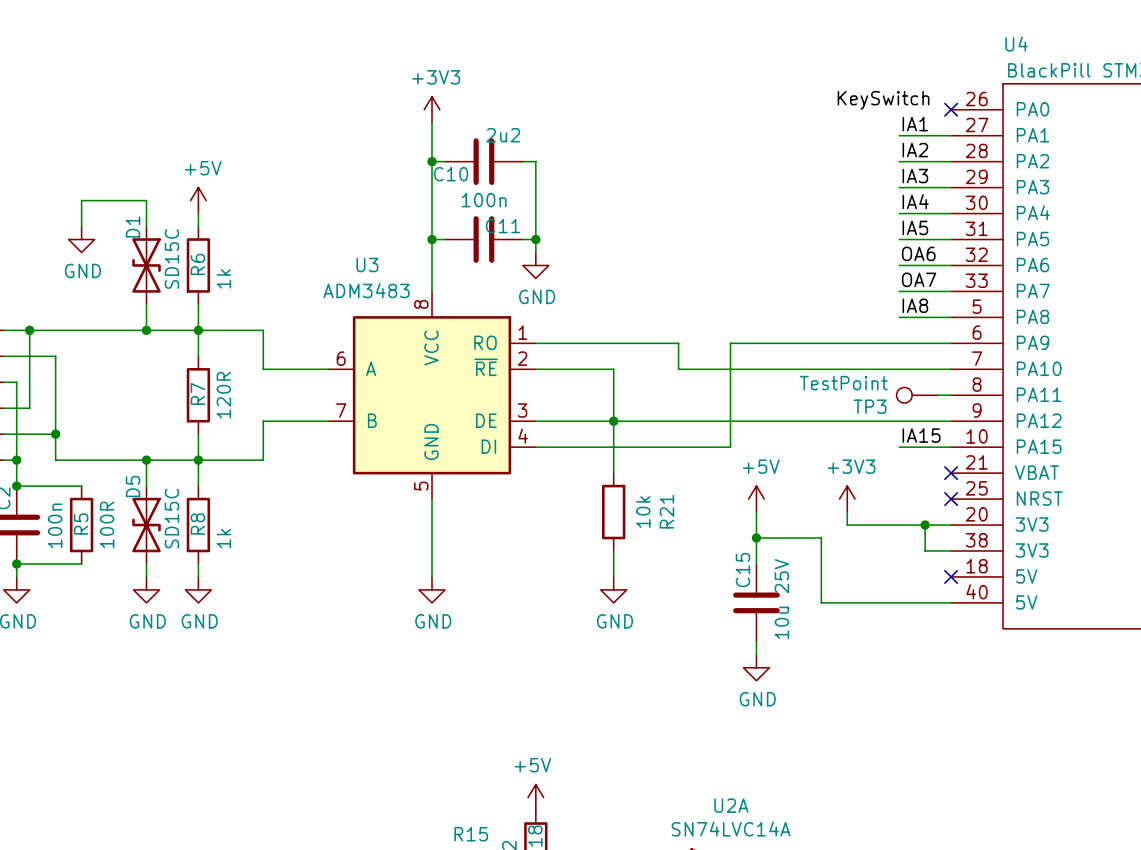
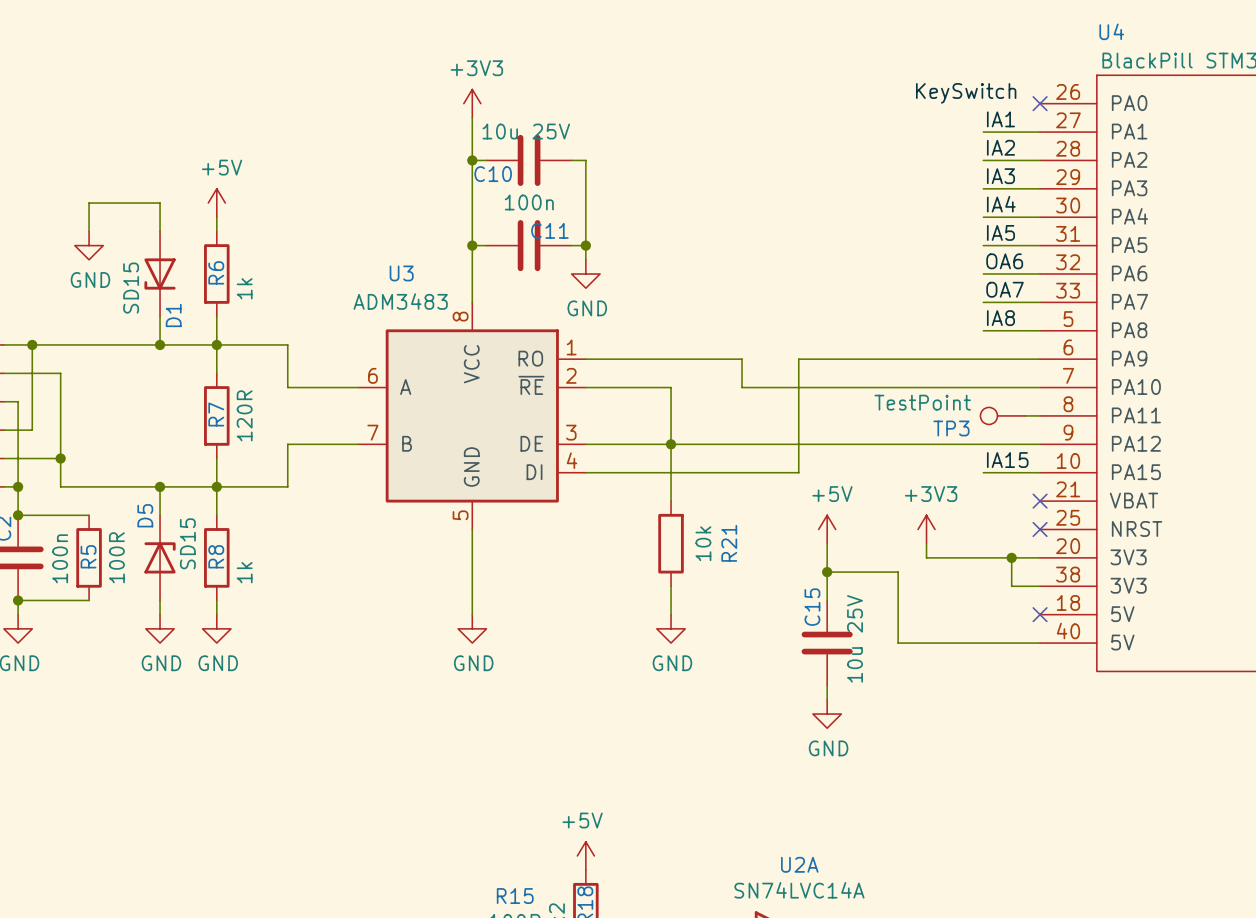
C10 value: 2u2 (503, 135) -> 10u 25V (526, 131)
D1 symbol: [132, 226, 161, 305] -> [144, 231, 176, 317]
D1 name position: D1 (133, 226) -> D1 (173, 315)
D1 value: SD15C (171, 259) -> SD15 (131, 288)
D5 symbol: [132, 486, 161, 564] -> [144, 515, 176, 601]
D5 value: SD15C (171, 518) -> SD15 (187, 543)

